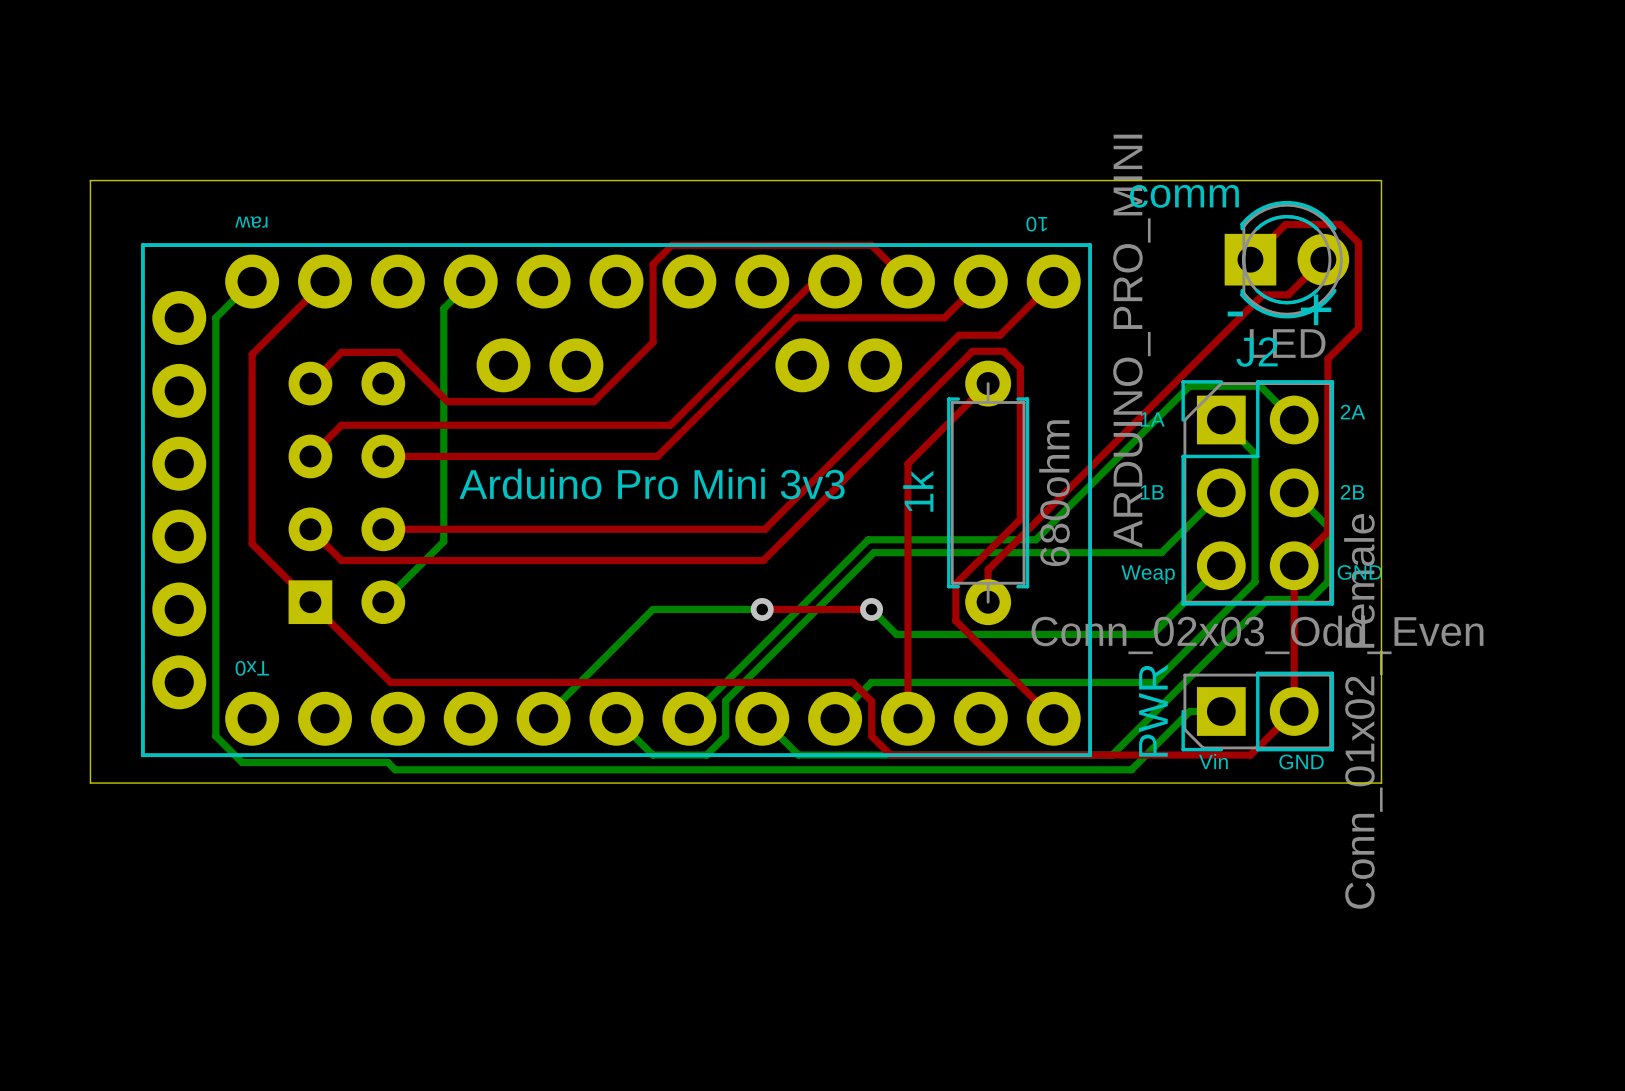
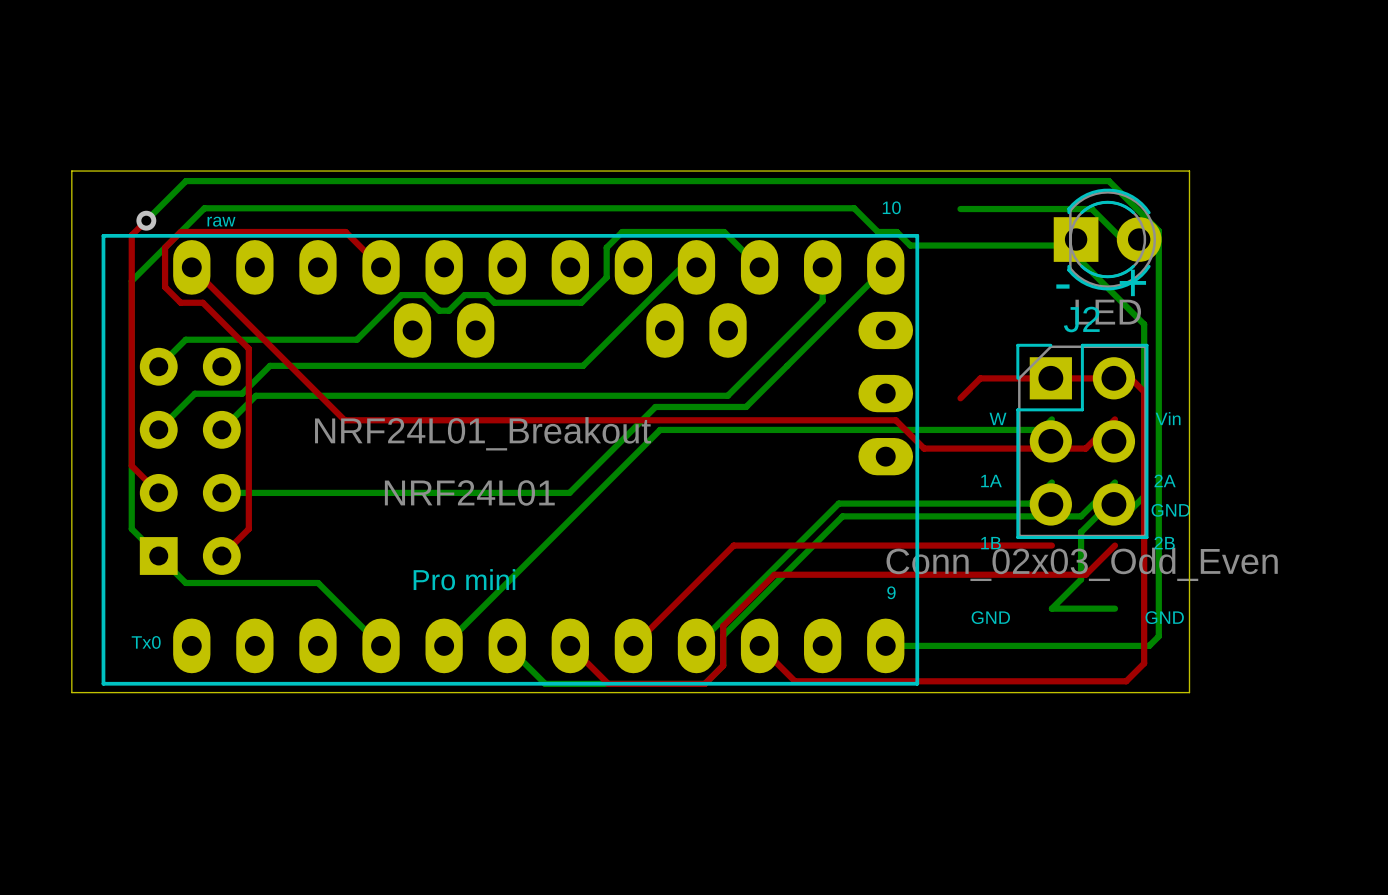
comm name: comm (1184, 196) -> none
text rotation: 0° (251, 222) -> 180° (221, 221)
text rotation: 0° (1036, 224) -> 180° (891, 207)
bottom track: none -> (960, 209) (1091, 209) (1128, 245)
top track: none -> (146, 220) (131, 235) (131, 465) (158, 492)
bottom track: none -> (146, 220) (185, 181) (1108, 181) (1158, 230) (1158, 636) (1149, 645) (885, 645)
via: none -> (146, 220)
top track: (1250, 259) (1285, 224) (1340, 224) (1358, 242) (1358, 328) (1327, 358) (1327, 532) (1294, 565) (1294, 711) (1250, 755) (890, 755) (871, 736) (871, 701) (852, 682) (390, 682) (252, 543) (252, 354) (325, 281) -> none
top track: (1323, 259) (1288, 294) (1263, 294) (988, 569) (988, 602) -> none
bottom track: (252, 281) (215, 317) (215, 736) (242, 762) (387, 762) (395, 769) (1131, 769) (1189, 711) (1221, 711) -> none
bottom track: (470, 281) (443, 308) (443, 541) (383, 602) -> none
top track: (835, 281) (814, 281) (670, 425) (341, 425) (310, 456) -> none
top track: (907, 281) (871, 245) (671, 245) (653, 264) (653, 342) (593, 401) (447, 401) (398, 352) (341, 352) (310, 383) -> none
top track: (980, 281) (944, 317) (796, 317) (657, 456) (383, 456) -> none
top track: (1053, 281) (1000, 335) (958, 335) (764, 529) (383, 529) -> none
top track: none -> (191, 267) (344, 420) (895, 420) (924, 448) (1085, 448) (1114, 419)
top track: none -> (381, 267) (345, 232) (180, 232) (165, 247) (165, 287) (180, 302) (202, 302) (248, 348) (248, 529) (221, 555)
bottom track: none -> (696, 267) (681, 267) (583, 365) (269, 365) (242, 393) (194, 393) (158, 429)
bottom track: none -> (759, 267) (724, 232) (622, 232) (606, 247) (606, 277) (581, 302) (494, 302) (486, 295) (464, 295) (448, 310) (439, 310) (423, 295) (401, 295) (356, 339) (185, 339) (158, 366)
bottom track: none -> (822, 267) (822, 300) (727, 395) (255, 395) (221, 429)
bottom track: none -> (885, 267) (746, 406) (655, 406) (569, 492) (221, 492)
top track: (988, 383) (907, 463) (907, 718) -> none
text position: 2A (1353, 412) -> 2A (1165, 480)
text position: 1A (1152, 419) -> 1A (991, 481)
bottom track: (1221, 420) (1255, 453) (1255, 581) (1154, 682) (871, 682) (835, 718) -> none
bottom track: (1294, 420) (1260, 386) (1189, 386) (1036, 539) (868, 539) (689, 718) -> none
top track: none -> (960, 398) (980, 378) (1130, 378) (1144, 391) (1144, 663) (1126, 681) (794, 681) (759, 645)
text: none -> W (998, 418)
bottom track: none -> (1051, 419) (1041, 429) (660, 429) (444, 645)
part: (346, 492) -> none
1k: 680ohm (988, 492) -> none
text position: 1B (1152, 492) -> 1B (991, 543)
bottom track: (1221, 492) (1161, 552) (873, 552) (725, 700) (725, 736) (706, 755) (652, 755) (616, 718) -> none
bottom track: (1294, 492) (1327, 526) (1327, 581) (1310, 599) (1267, 599) (1112, 755) (798, 755) (762, 718) -> none
text position: 2B (1352, 492) -> 2B (1164, 543)
Arduino Pro Mini 3v3: ARDUINO_PRO_MINI (616, 500) -> none
Pro mini: none -> (510, 459)
NRF24L01: none -> NRF24L01_Breakout (190, 461)
top track: (310, 529) (341, 560) (763, 560) (972, 351) (1003, 351) (1020, 368) (1020, 519) (955, 583) (955, 620) (1053, 718) -> none
bottom track: none -> (1051, 482) (1030, 503) (838, 503) (696, 645)
bottom track: none -> (1114, 482) (1081, 516) (842, 516) (723, 635) (723, 665) (704, 683) (545, 683) (507, 645)
bottom track: (1221, 565) (1152, 634) (896, 634) (871, 609) -> none
text: Weap (1148, 574) -> none
top track: (762, 609) (871, 609) -> none
bottom track: (762, 609) (652, 609) (543, 718) -> none
via: (762, 609) -> none
via: (871, 609) -> none
top track: none -> (1051, 545) (733, 545) (633, 645)
top track: none -> (1114, 545) (1085, 574) (774, 574) (723, 626) (723, 665) (704, 683) (608, 683) (570, 645)
text: none -> 9 (891, 592)
text rotation: 0° (252, 668) -> 180° (146, 642)
text position: Tx0 (252, 668) -> Tx0 (146, 642)
bottom track: none -> (1114, 608) (1051, 608) (1081, 579) (1081, 532) (1101, 511) (1128, 511) (1144, 496) (1144, 324) (1065, 245) (910, 245) (896, 232) (877, 232) (854, 208) (204, 208) (131, 280) (131, 529) (185, 582) (318, 582) (381, 645)
text: none -> GND (990, 617)
text: none -> GND (1164, 617)
PWR: Conn_01x02_Female (1257, 711) -> none
text position: Vin (1213, 761) -> Vin (1168, 418)
text: GND (1301, 761) -> none

